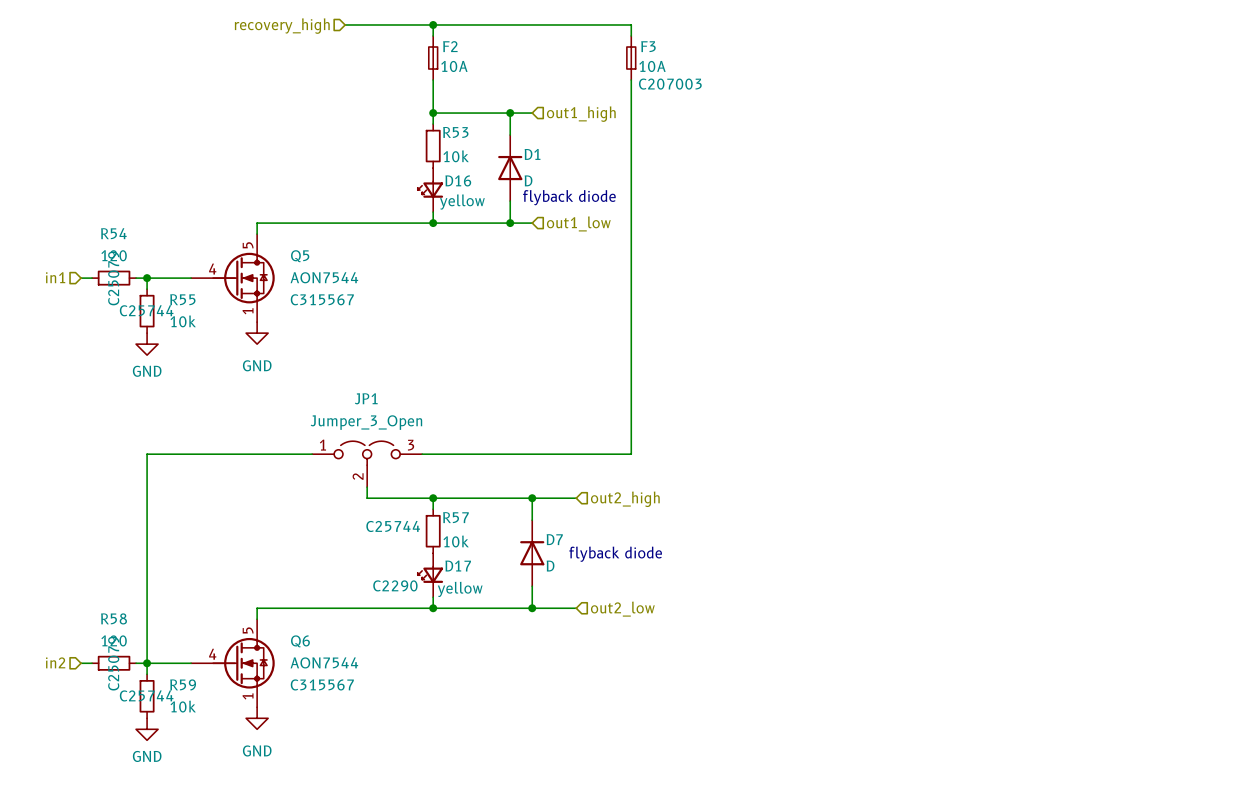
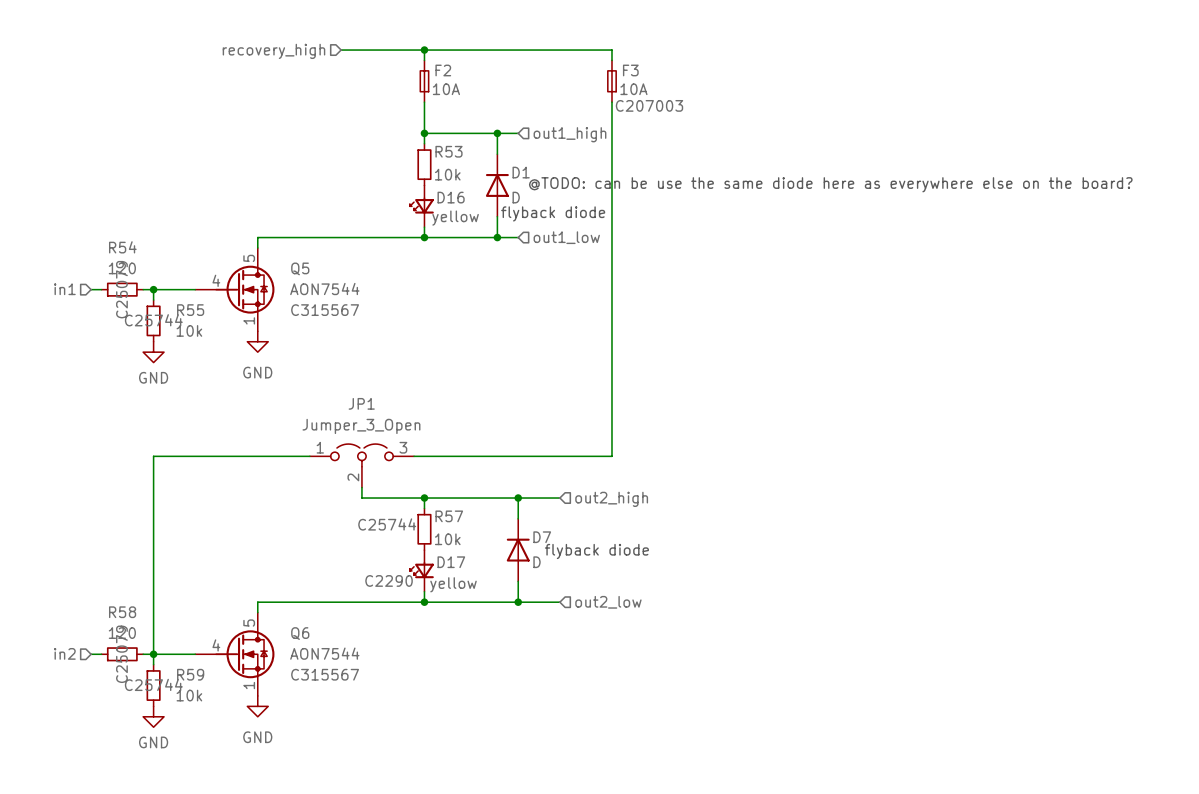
text: none -> @TODO: can be use the same diode here as everywhere else on the board? (830, 184)

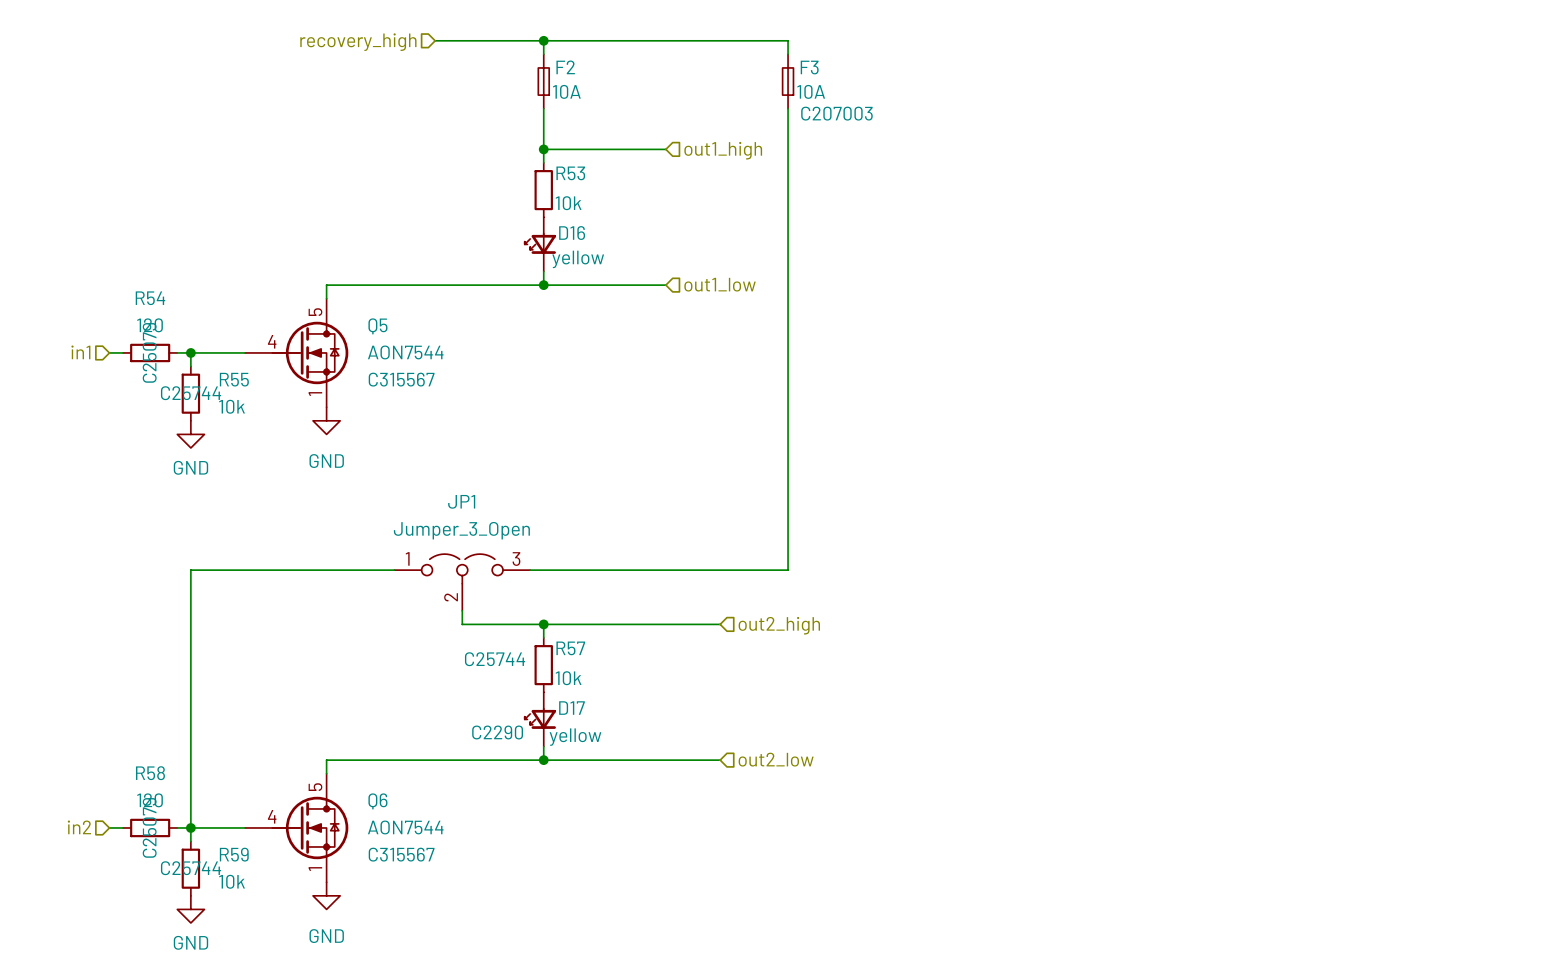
wire: (497, 133) (497, 154) -> none
junction: (497, 133) -> none
text: @TODO: can be use the same diode here as everywhere else on the board? (830, 184) -> none
D1: D (497, 185) -> none
text: flyback diode (553, 213) -> none
wire: (497, 216) (497, 237) -> none
junction: (497, 237) -> none
wire: (518, 498) (518, 518) -> none
junction: (518, 498) -> none
D7: D (518, 550) -> none
text: flyback diode (596, 551) -> none
wire: (518, 581) (518, 602) -> none
junction: (518, 602) -> none

